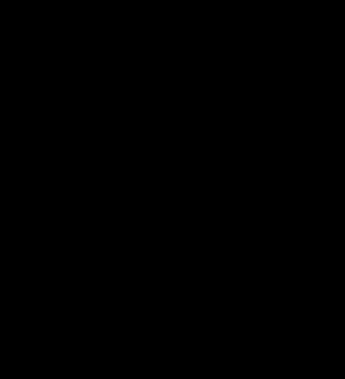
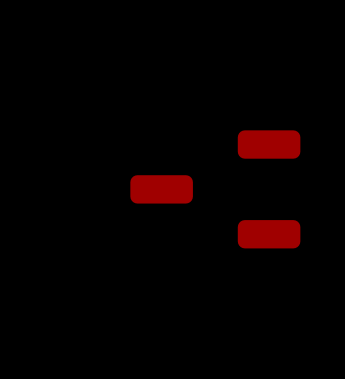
part: none -> (215, 189)

